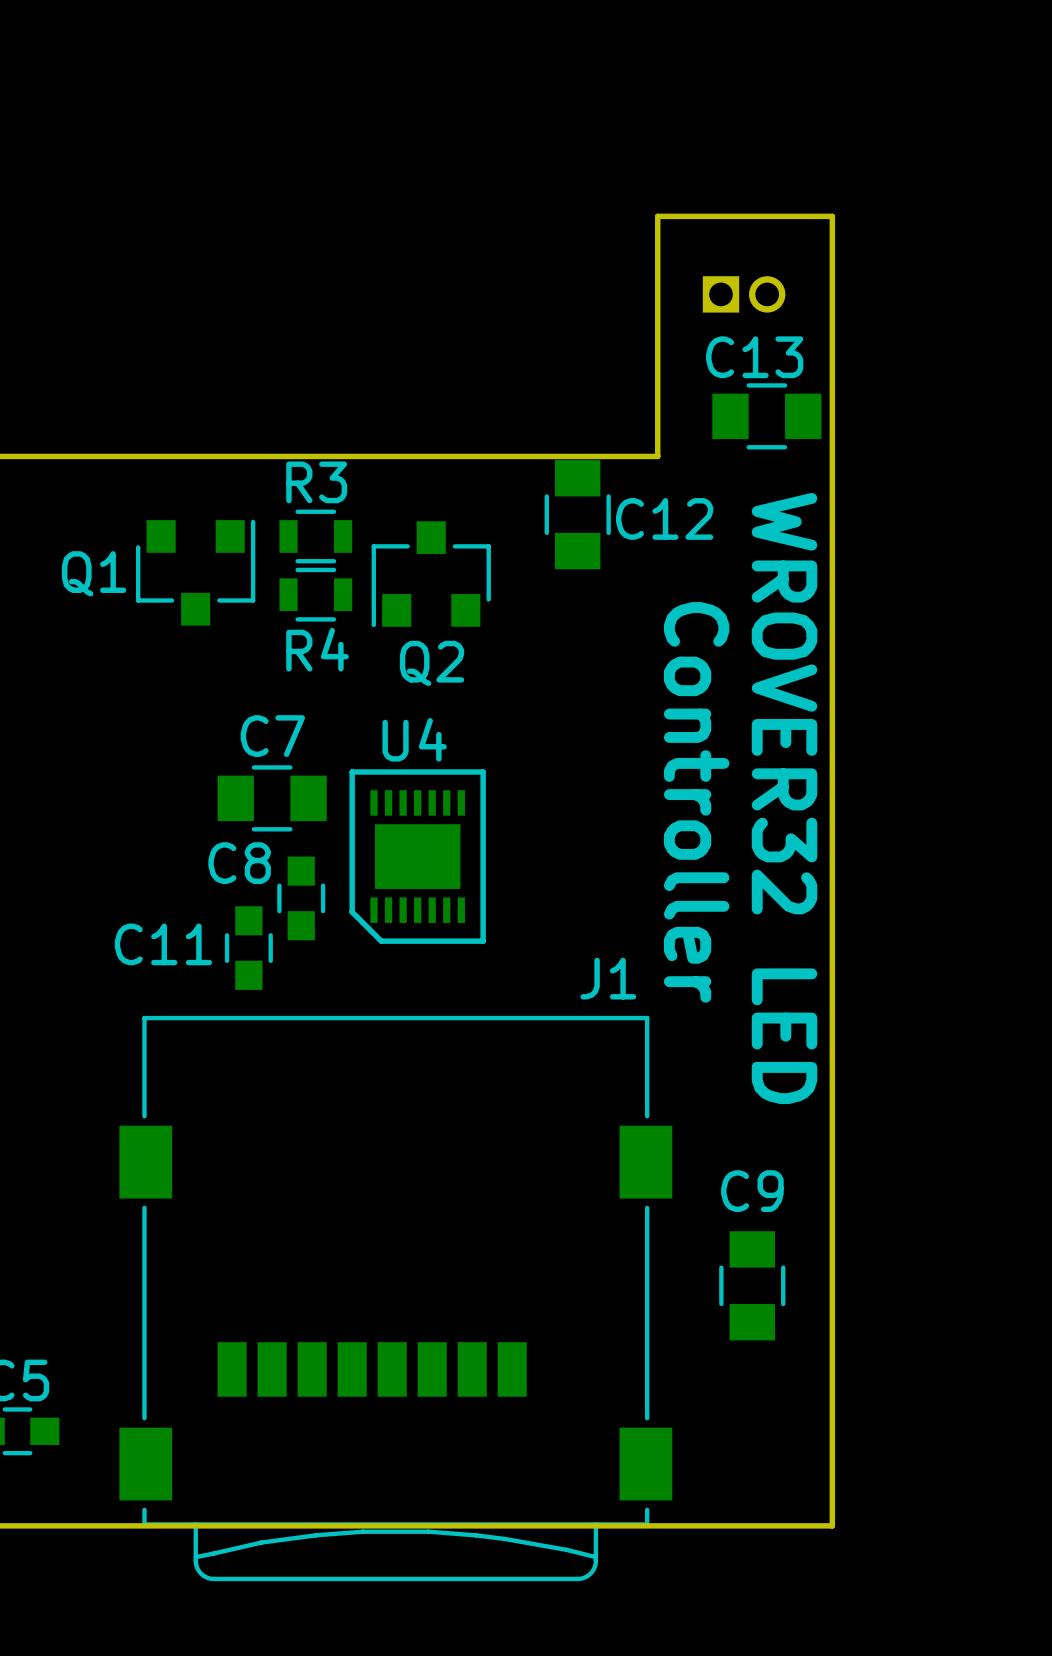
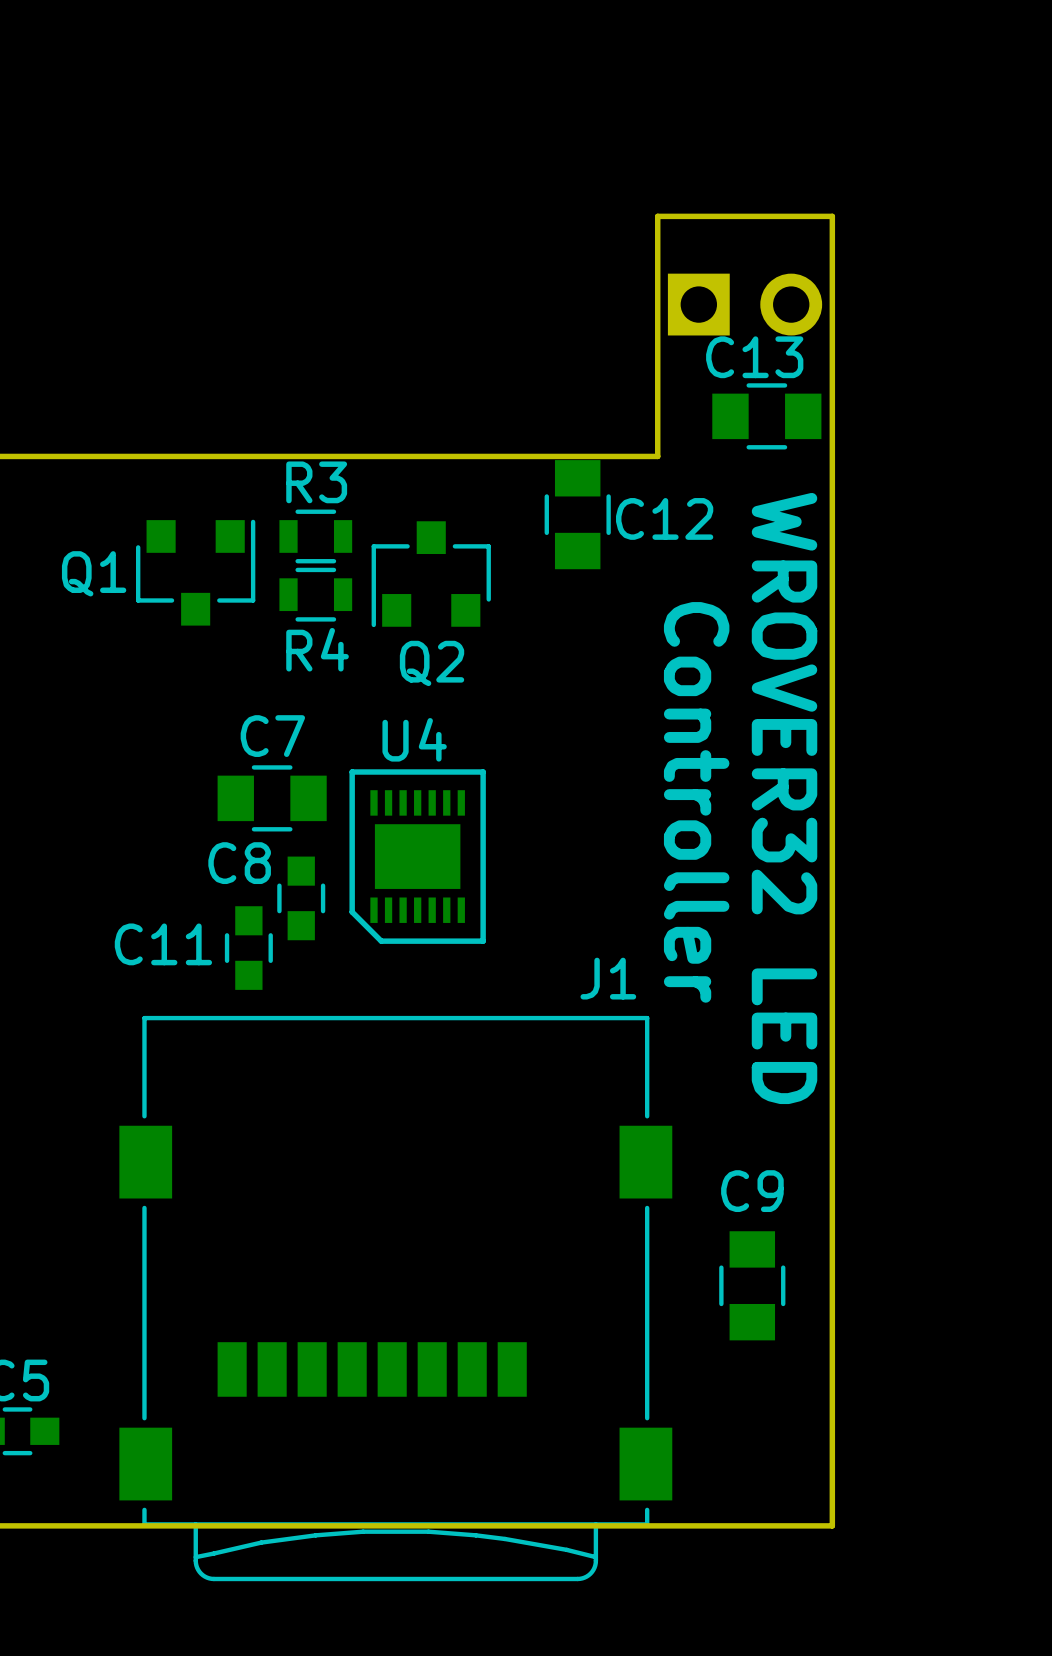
part footprint: [702, 276, 786, 313] -> [667, 273, 823, 336]

